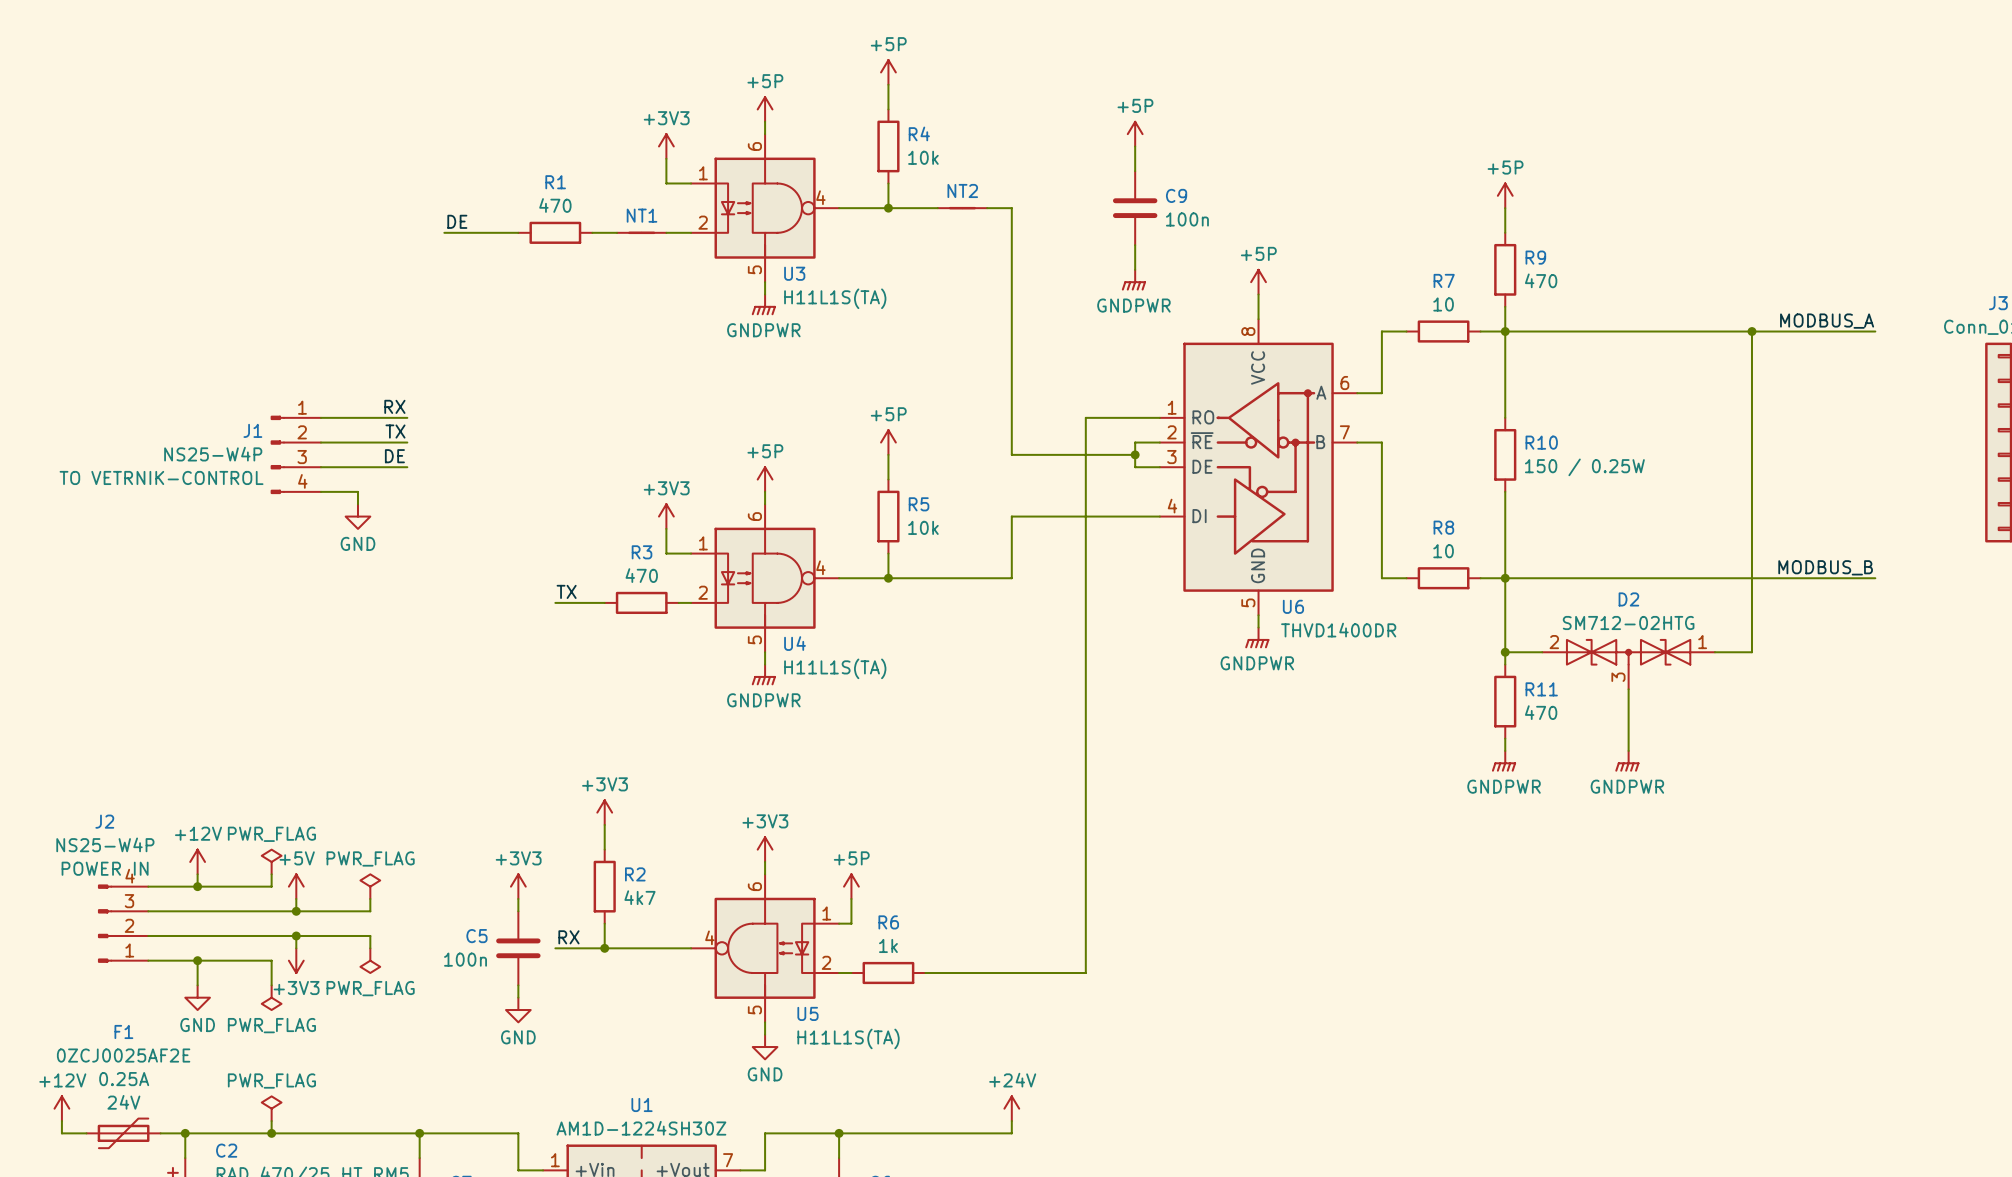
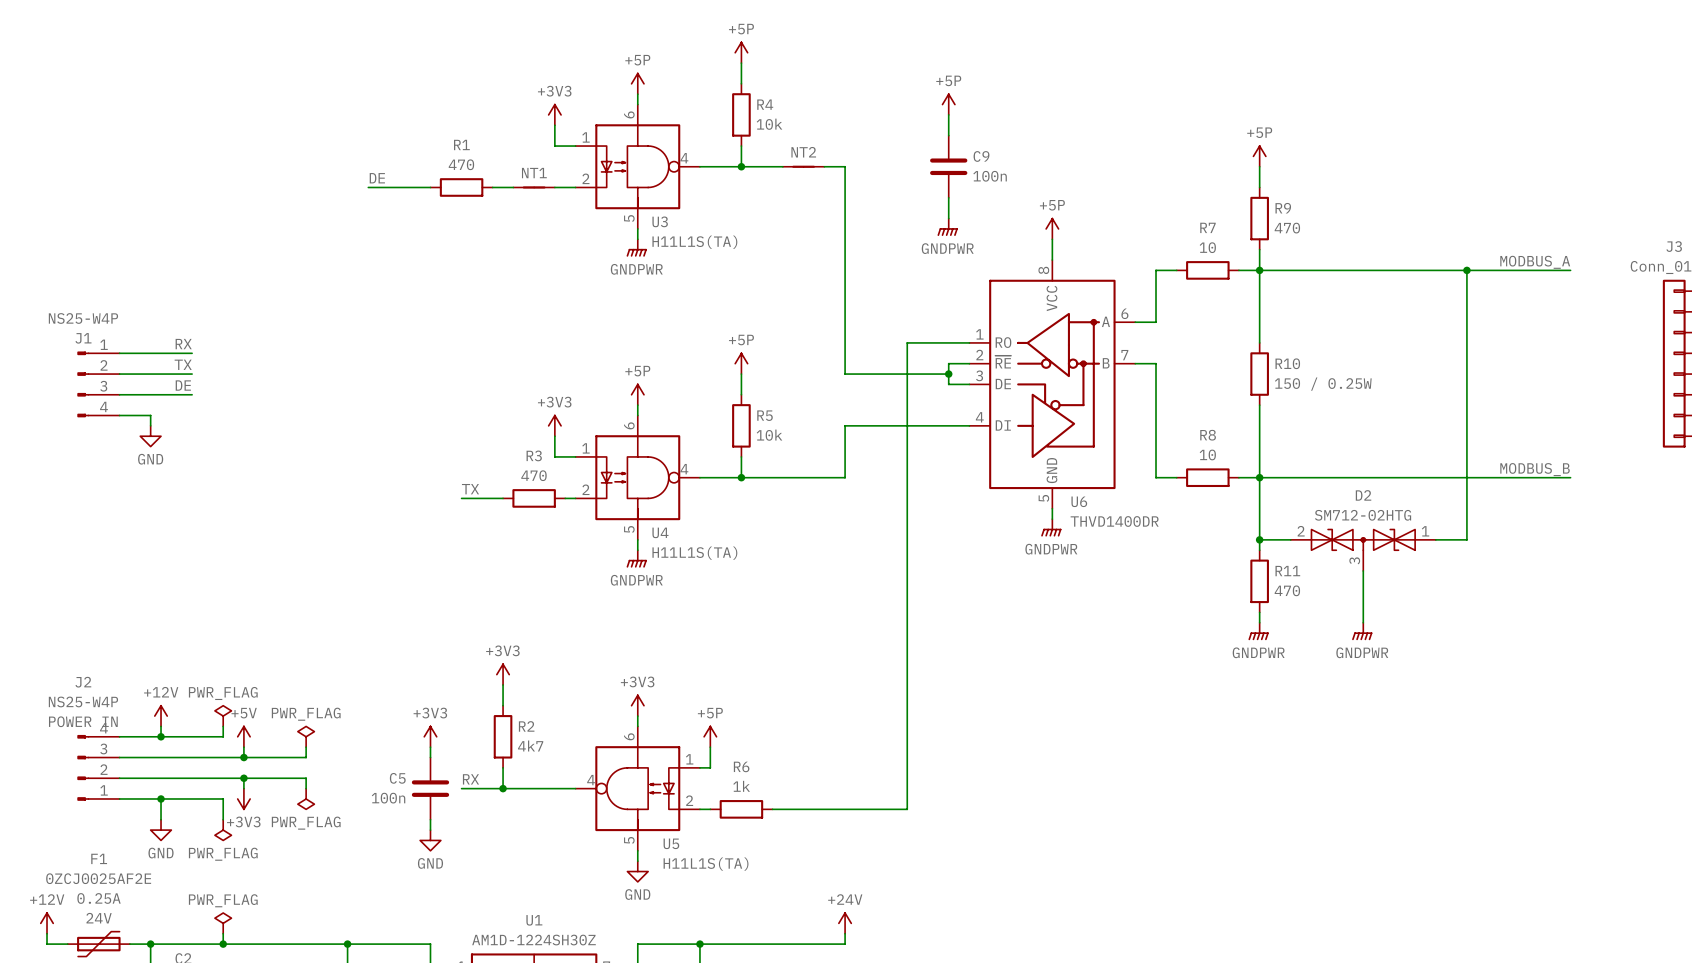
label position: RX (394, 406) -> RX (183, 344)
wire: (320, 417) (407, 417) -> (119, 353) (192, 353)
J1 name position: J1 (252, 430) -> J1 (83, 338)
label position: TX (395, 431) -> TX (183, 364)
wire: (320, 442) (407, 442) -> (119, 374) (192, 374)
J1 value position: NS25-W4P (213, 454) -> NS25-W4P (83, 318)
J1 position: (295, 454) -> (98, 384)
label position: DE (394, 456) -> DE (183, 385)
wire: (320, 467) (407, 467) -> (119, 394) (192, 394)
J1 text: TO VETRNIK-CONTROL (161, 477) -> none
wire: (320, 491) (357, 491) (357, 504) -> (119, 415) (150, 415) (150, 425)
power symbol position: GND (357, 516) -> GND (150, 436)

